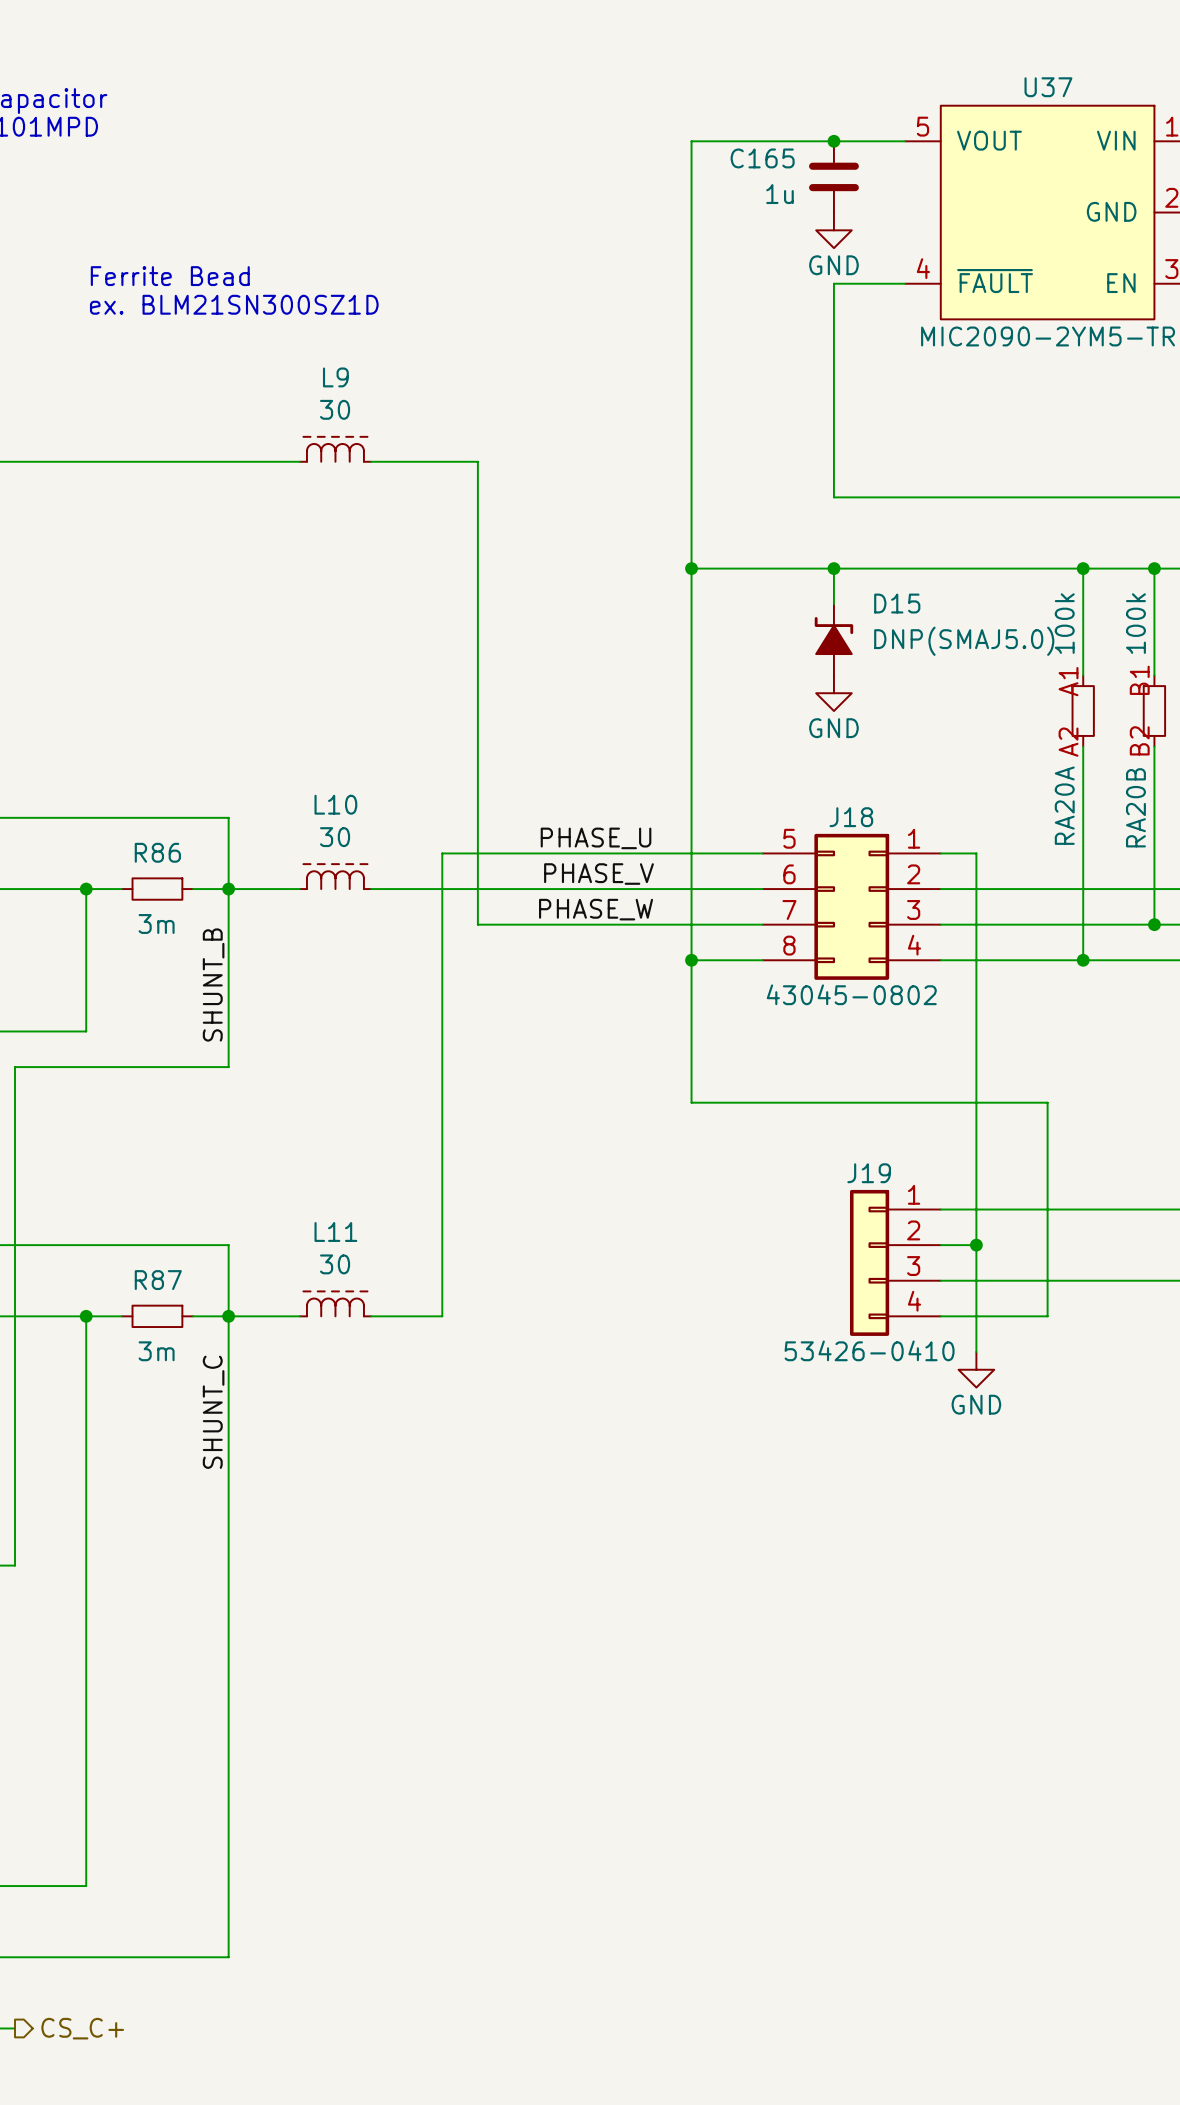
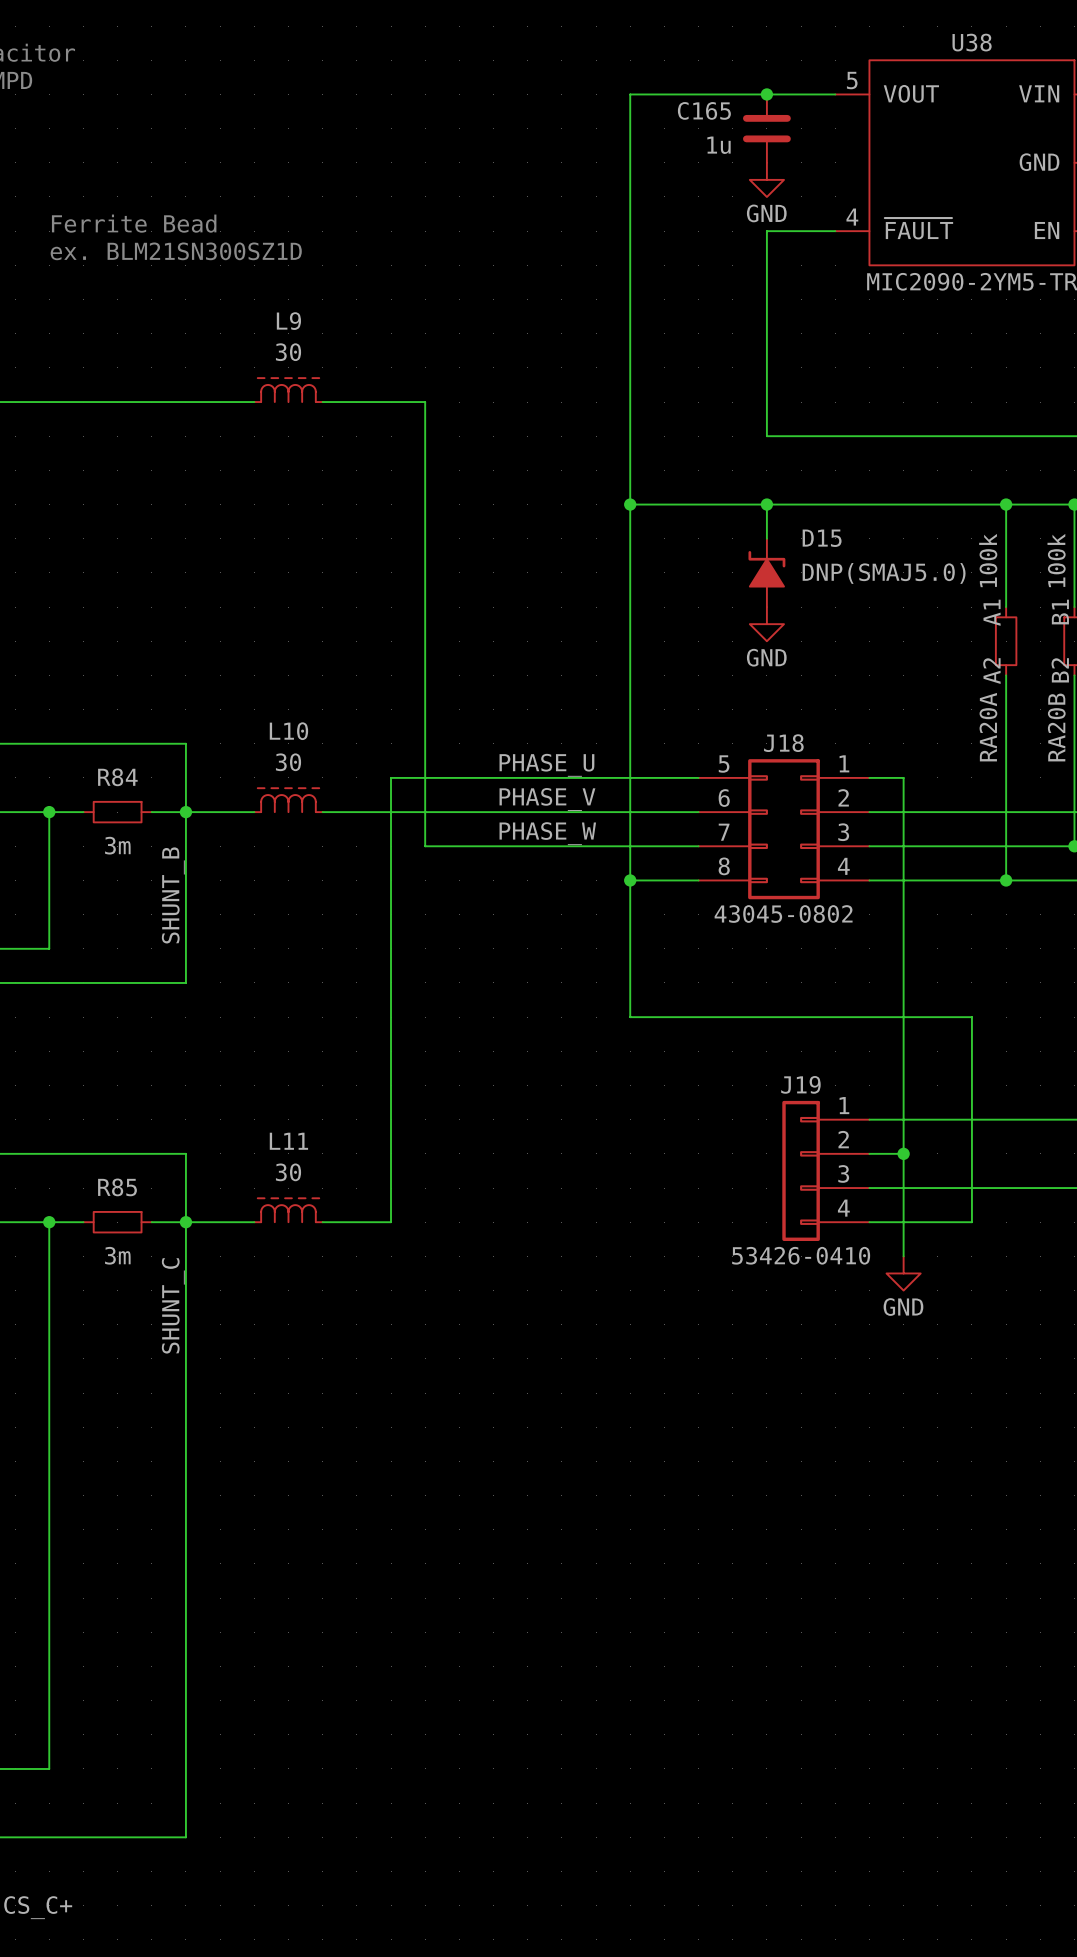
U37 name: U37 (1048, 87) -> U38 (972, 42)
R86 name: R86 (157, 852) -> R84 (117, 777)
R87 name: R87 (158, 1280) -> R85 (117, 1187)

